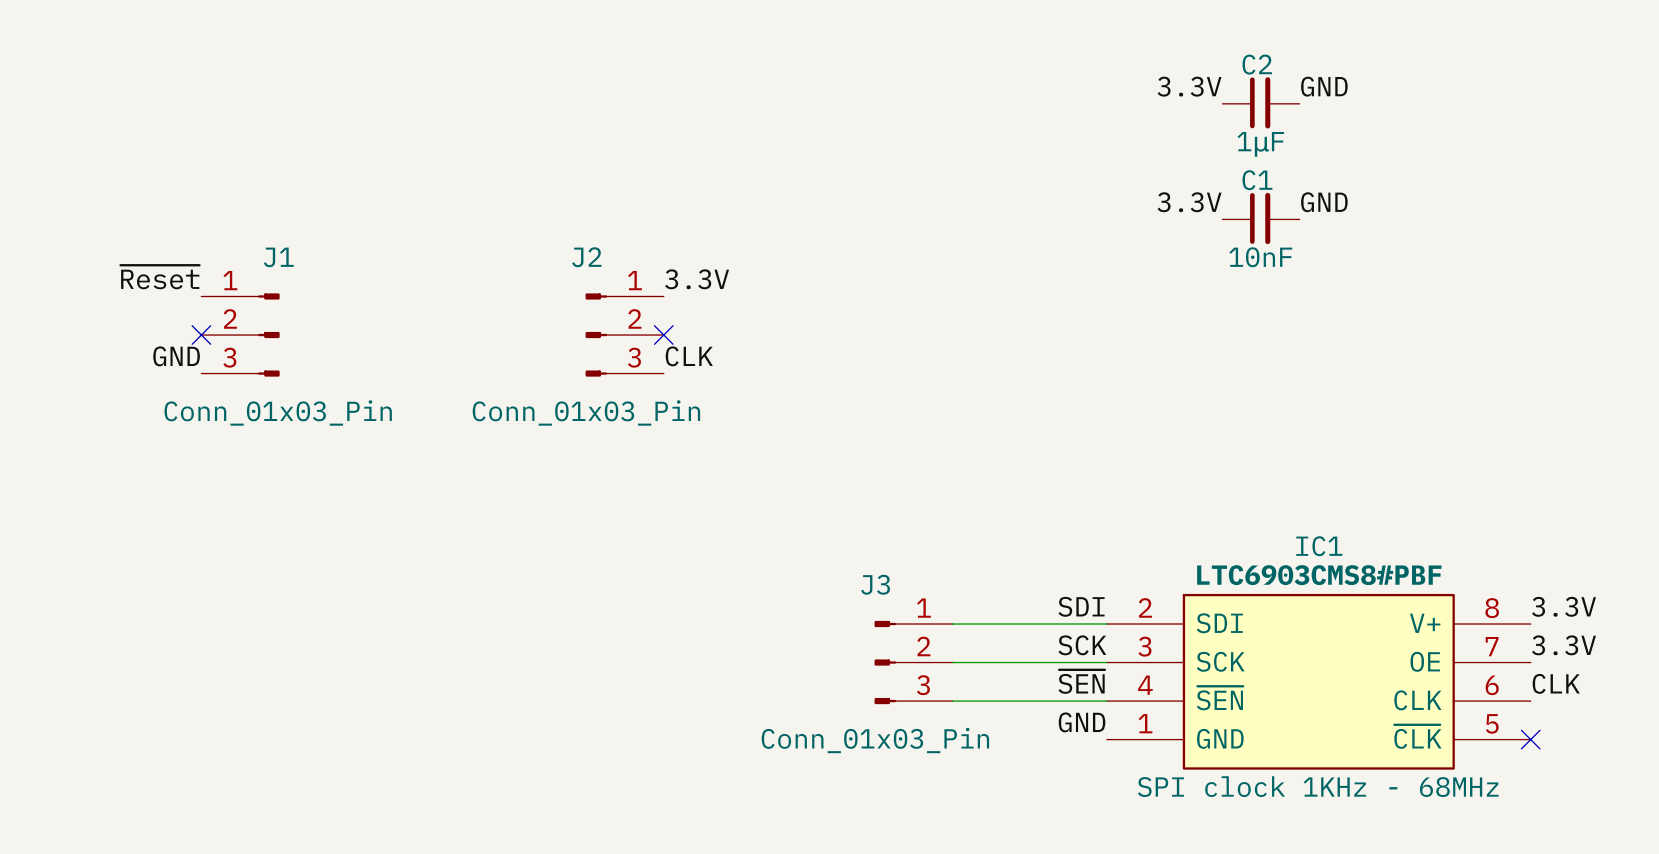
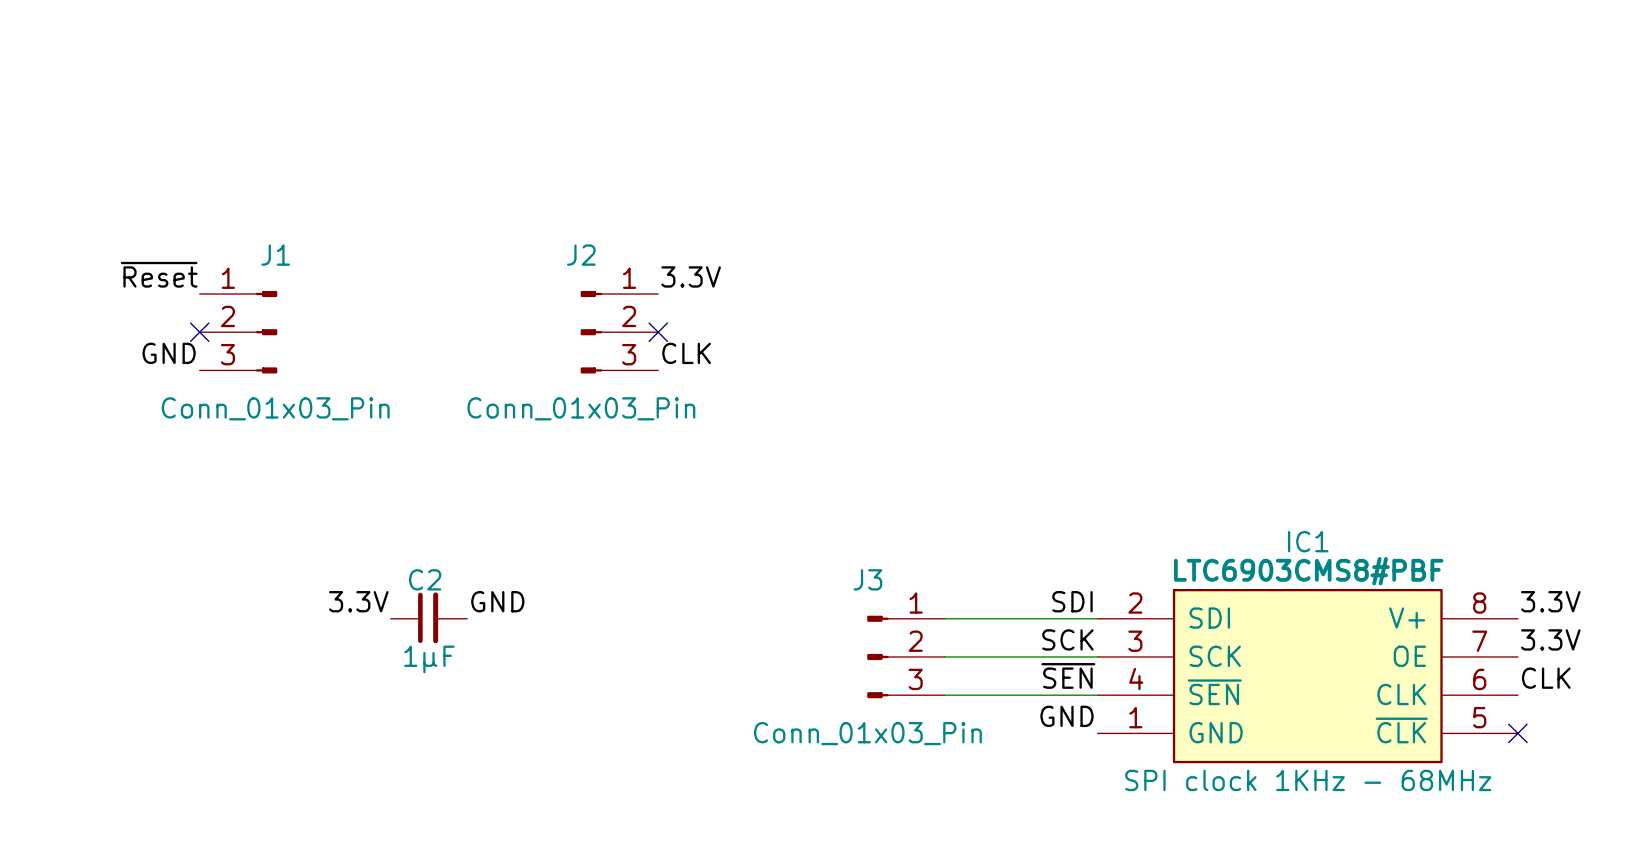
label: 3.3V (1189, 86) -> none
label: GND (1324, 86) -> none
C2 position: (1261, 102) -> (428, 617)
label: 3.3V (1189, 202) -> none
label: GND (1324, 202) -> none
C1: 10nF (1261, 218) -> none
label: none -> 3.3V (358, 601)
label: none -> GND (497, 601)

